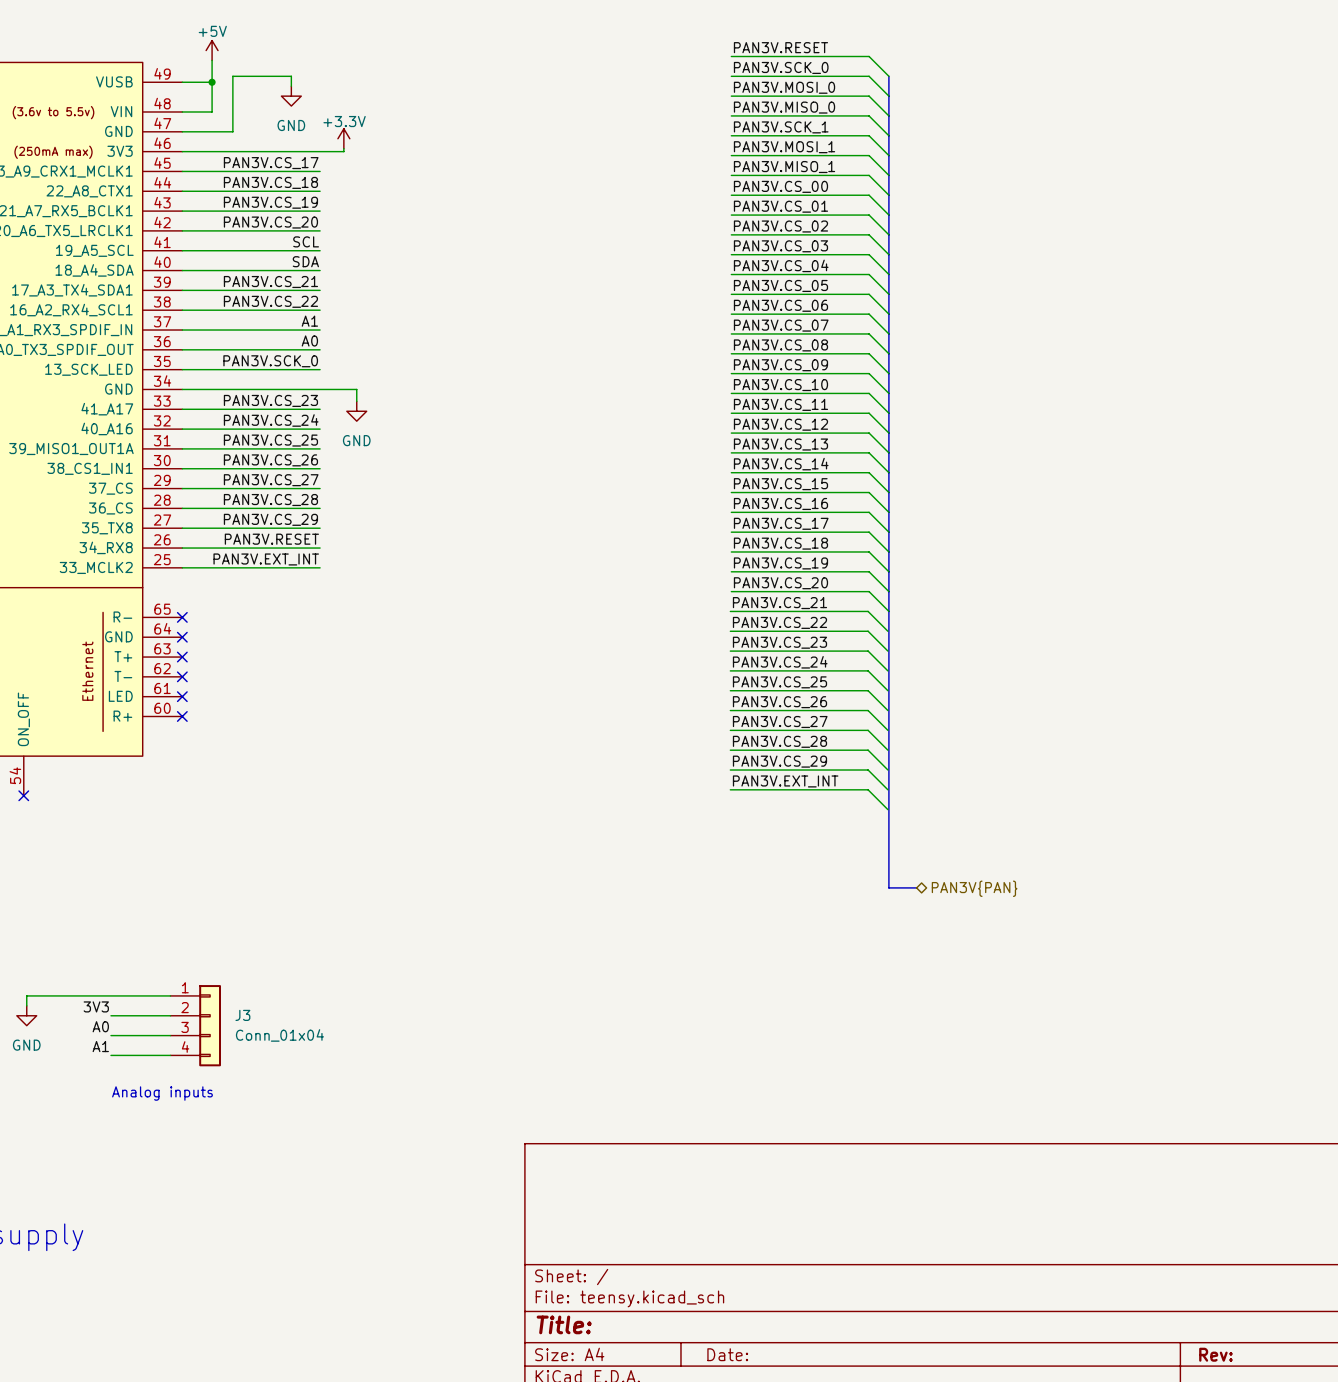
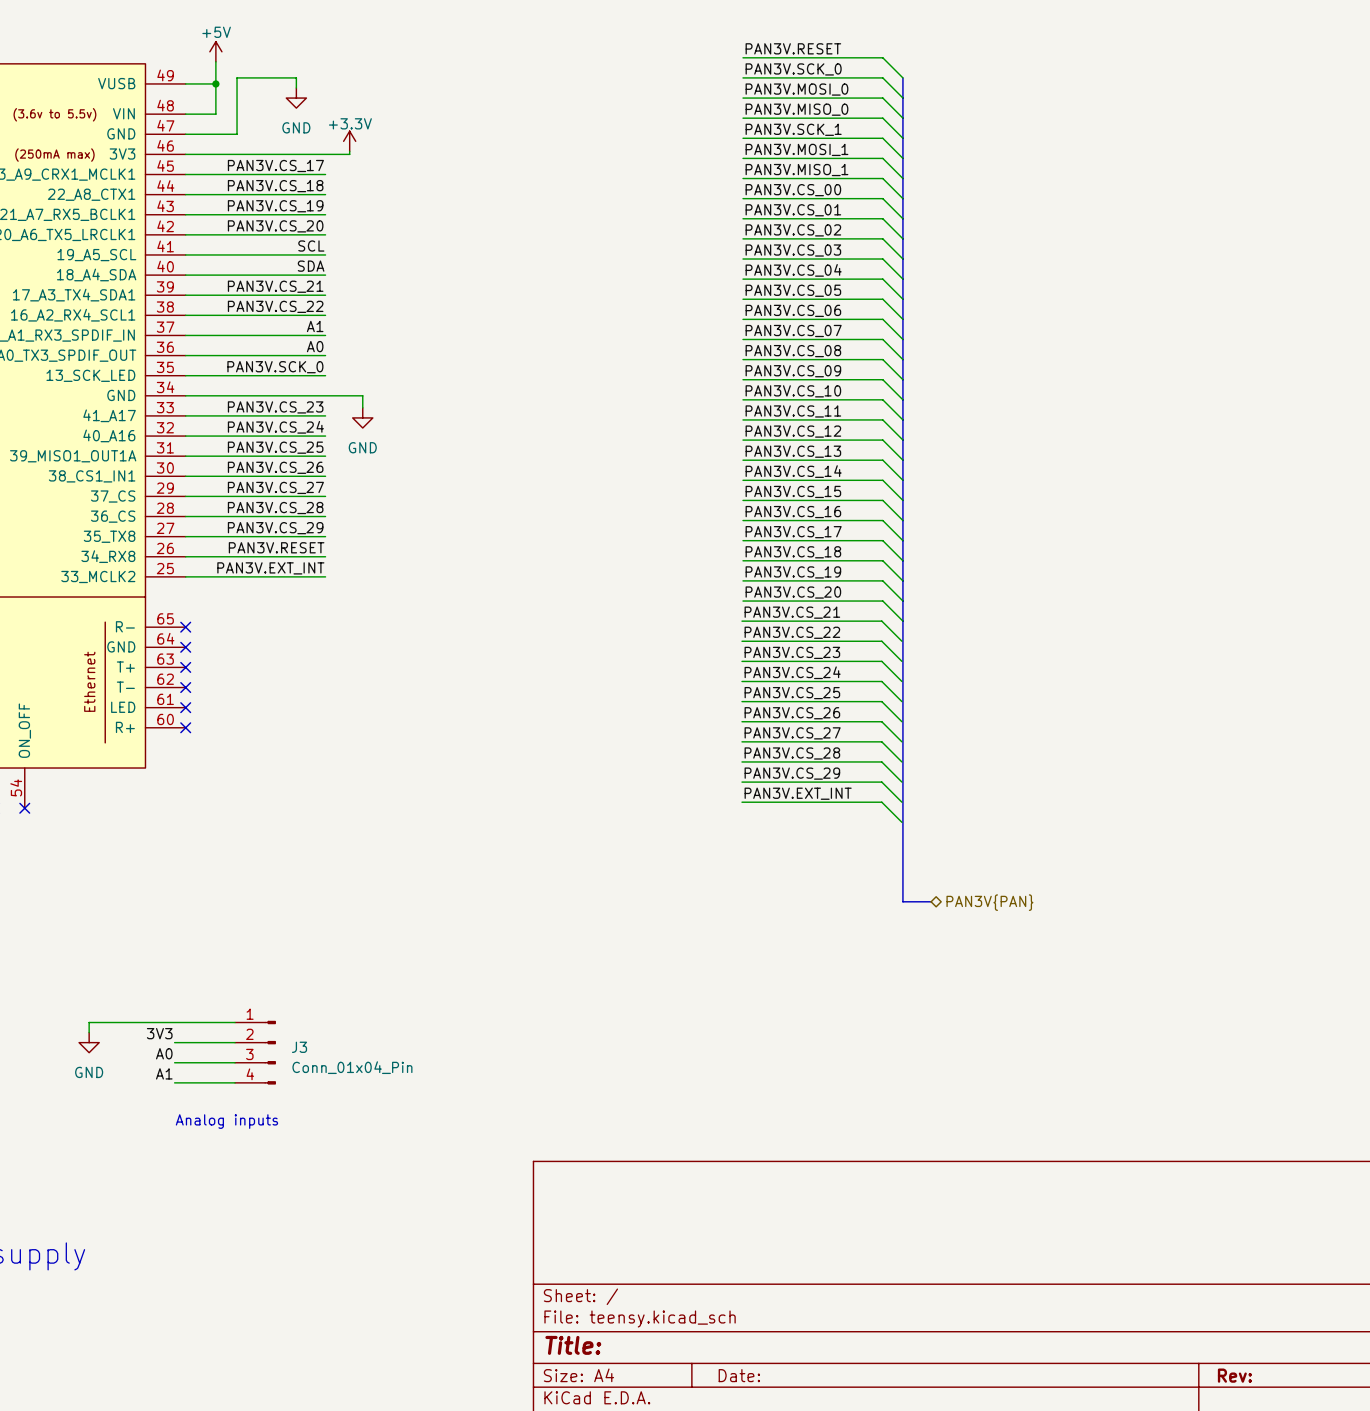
J3 symbol: [170, 985, 221, 1067] -> [235, 1020, 276, 1085]
wire: (170, 995) (26, 995) (26, 1005) -> (235, 1022) (89, 1022) (89, 1032)
label position: 3V3 (96, 1006) -> 3V3 (159, 1033)
power symbol position: GND (26, 1015) -> GND (89, 1042)
wire: (110, 1015) (170, 1015) -> (174, 1082) (235, 1082)
label position: A0 (100, 1026) -> A0 (164, 1053)
wire: (110, 1035) (170, 1035) -> (174, 1042) (235, 1042)
J3 value: Conn_01x04 (279, 1035) -> Conn_01x04_Pin (352, 1067)
label position: A1 (100, 1046) -> A1 (164, 1073)
wire: (110, 1055) (170, 1055) -> (174, 1062) (235, 1062)
text position: Analog inputs (162, 1093) -> Analog inputs (226, 1121)

